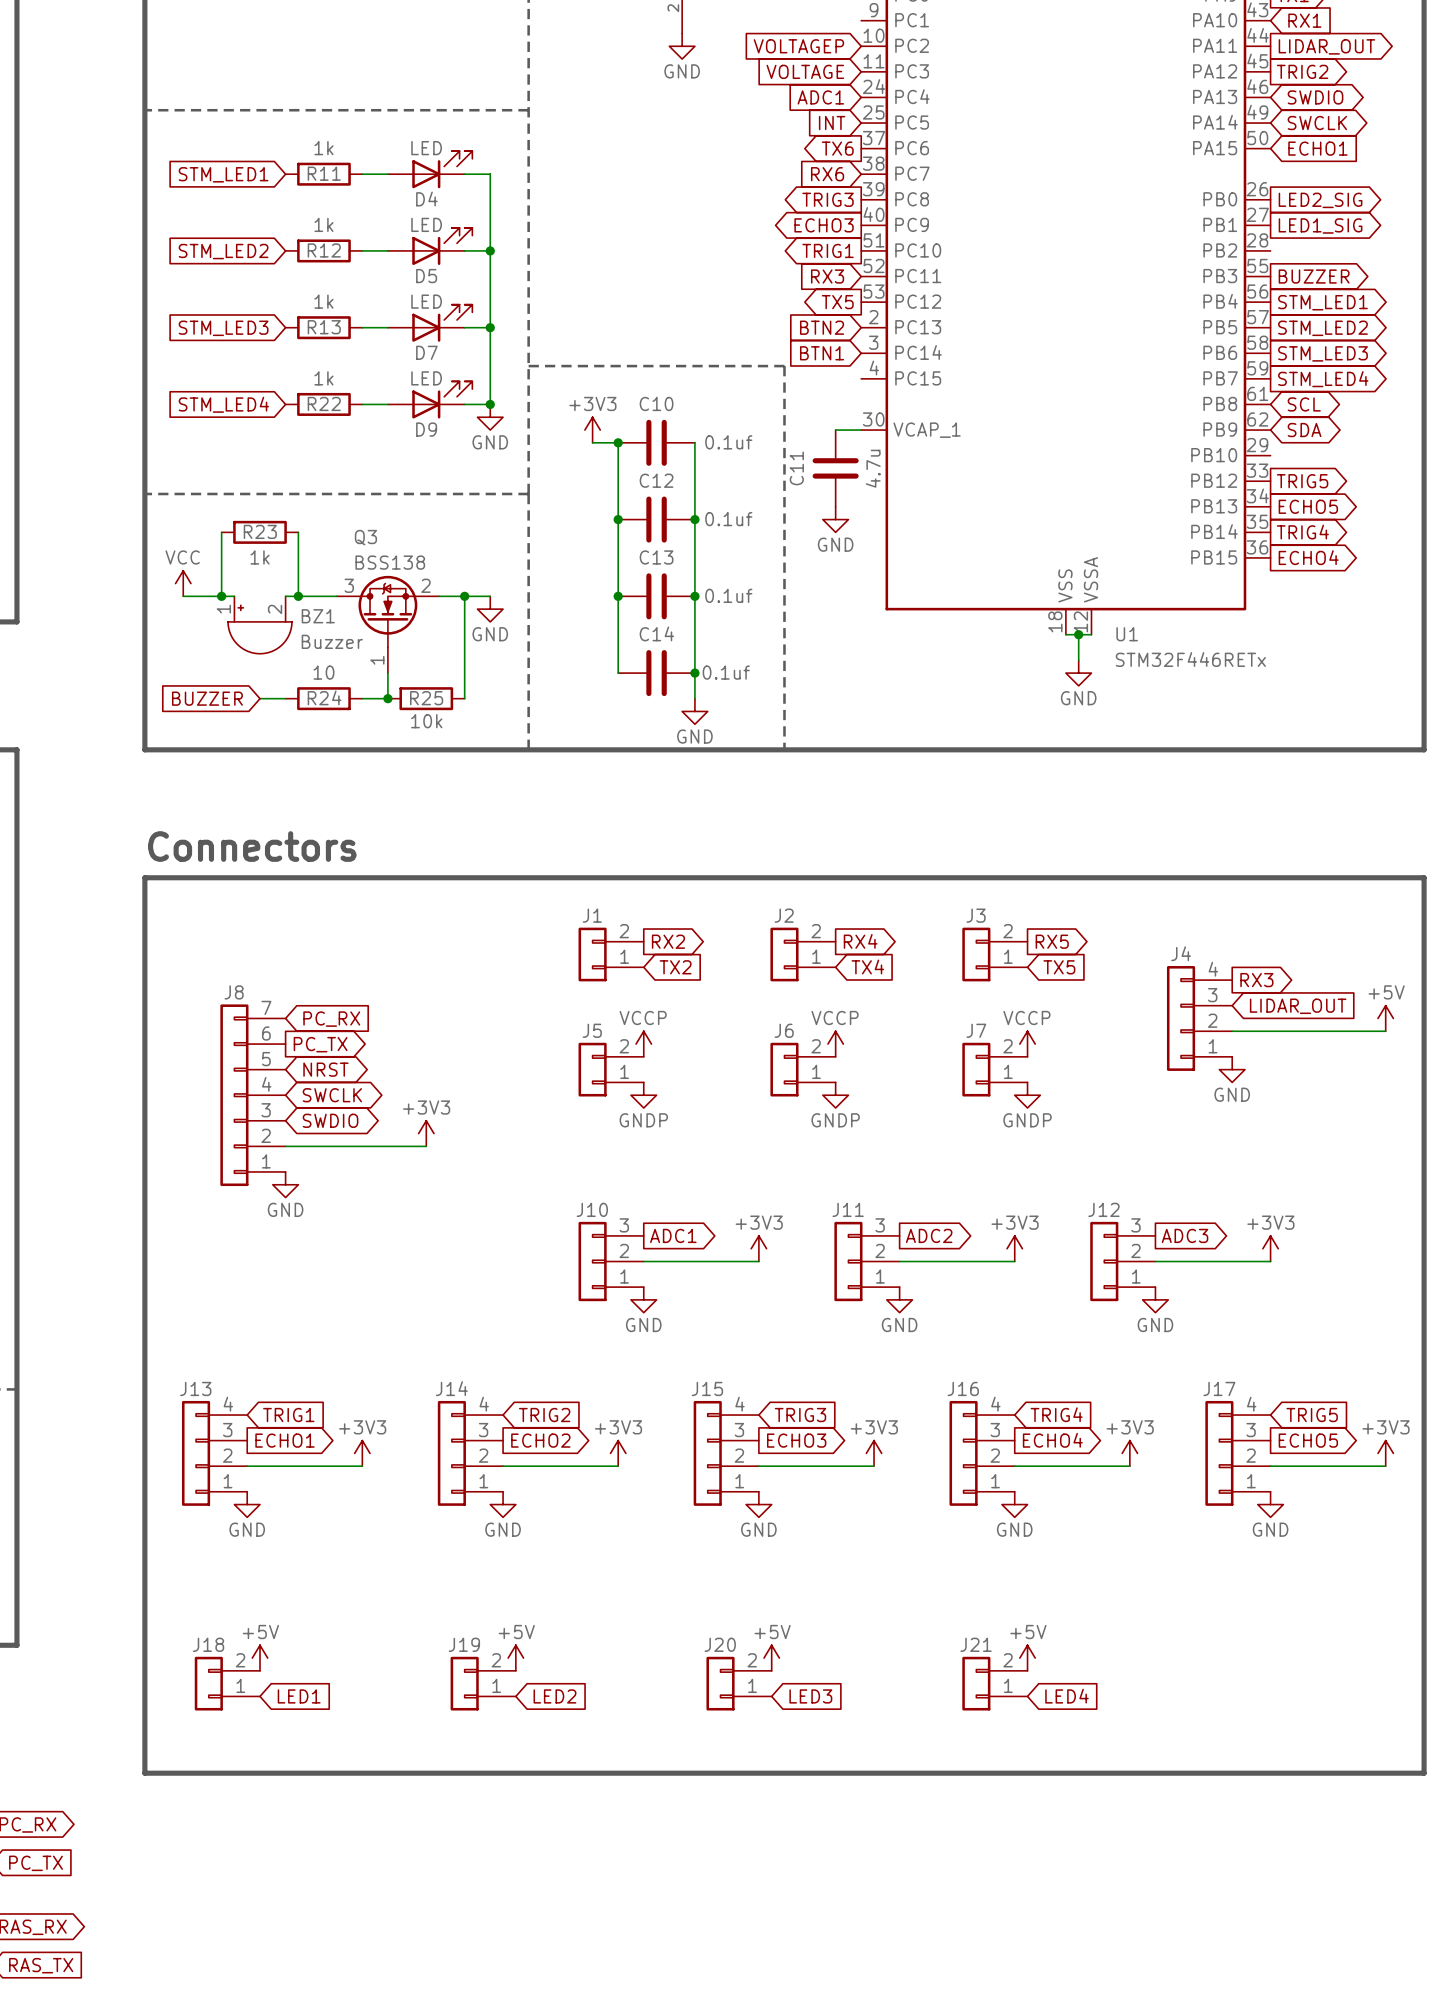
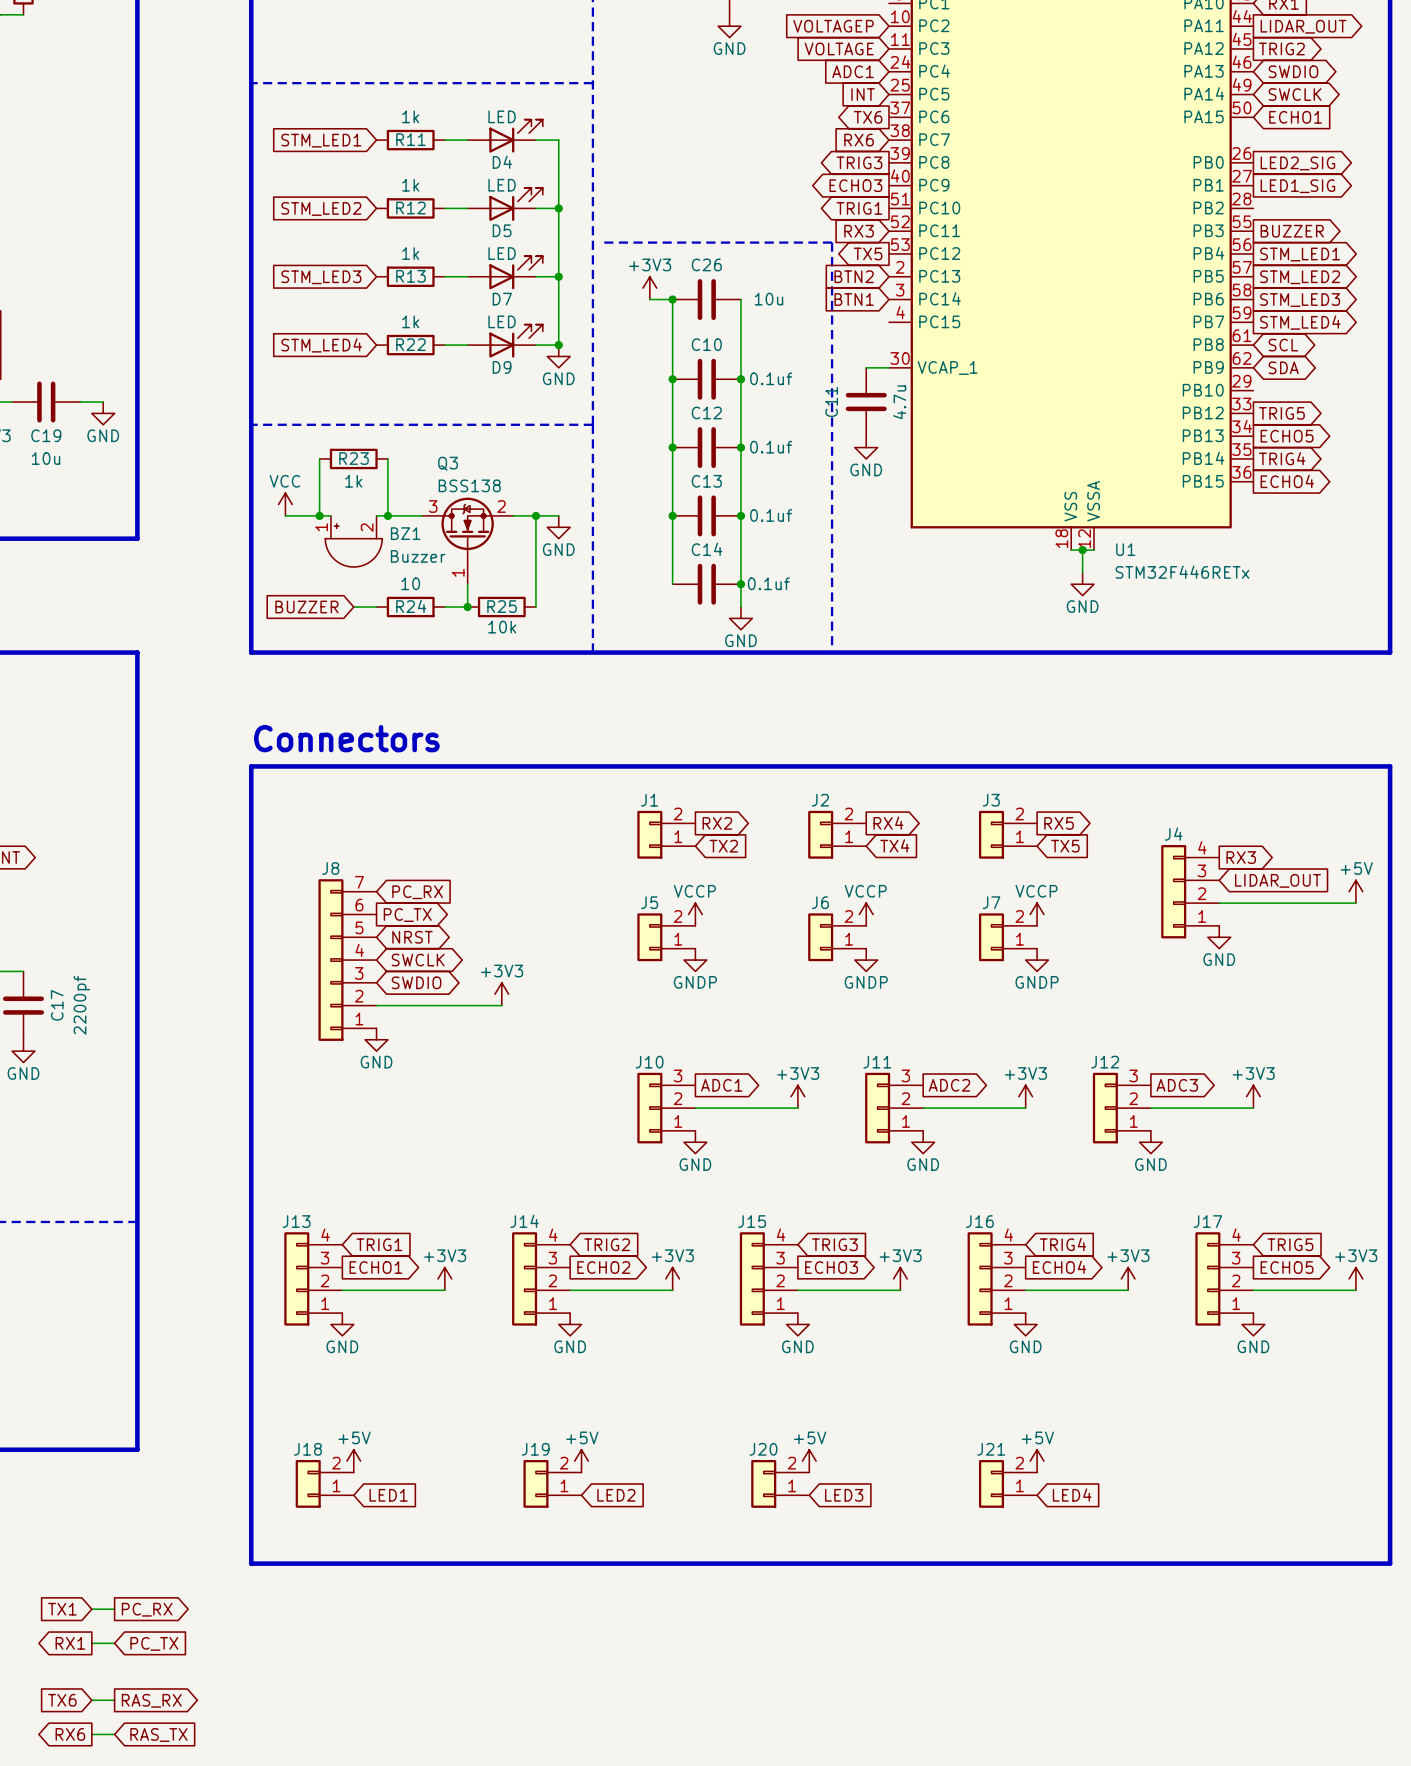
line: none -> (604, 242) (832, 242) (832, 652)
junction: none -> (672, 299)
C26: none -> 10u (706, 299)
wire: none -> (740, 299) (740, 379)
line: (528, 366) (784, 366) (784, 749) -> none
power symbol position: +3V3 (592, 430) -> +3V3 (649, 288)
wire: (592, 442) (618, 442) -> (649, 299) (672, 299) (672, 379)
junction: none -> (740, 379)

